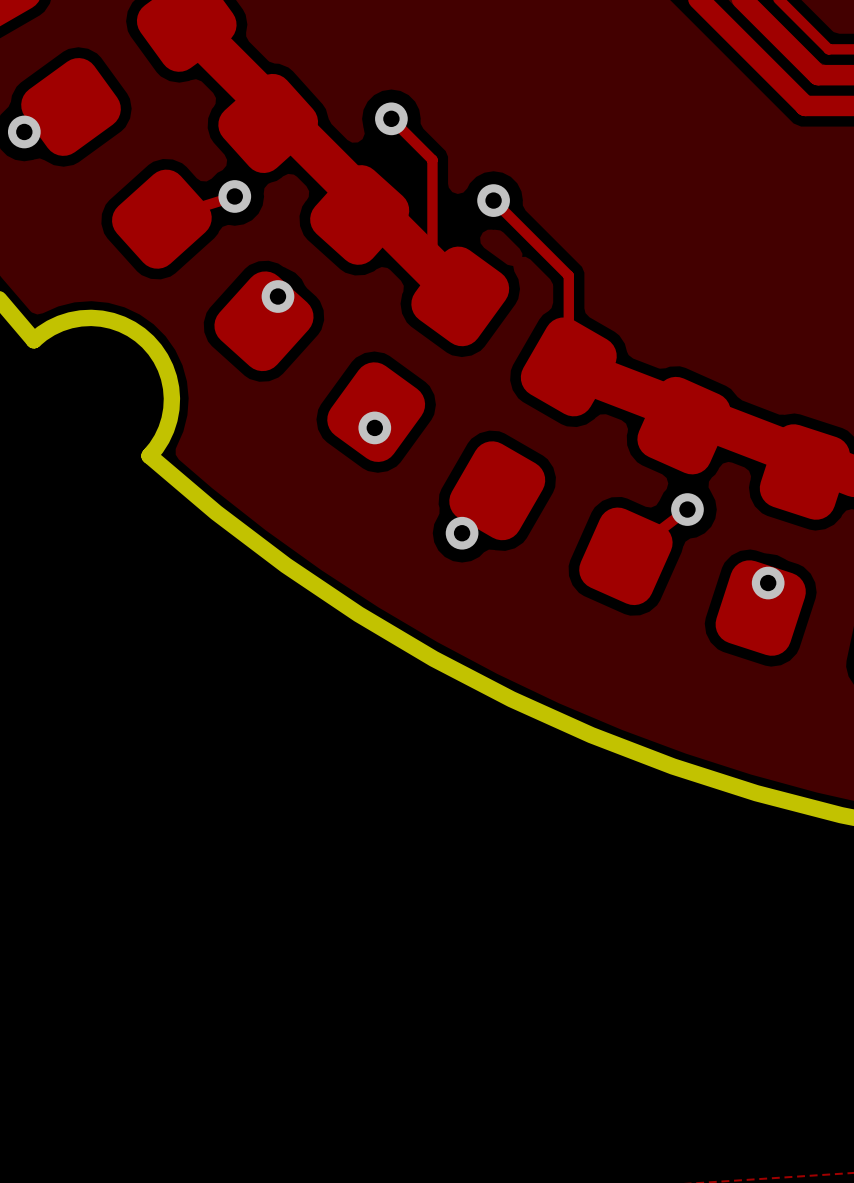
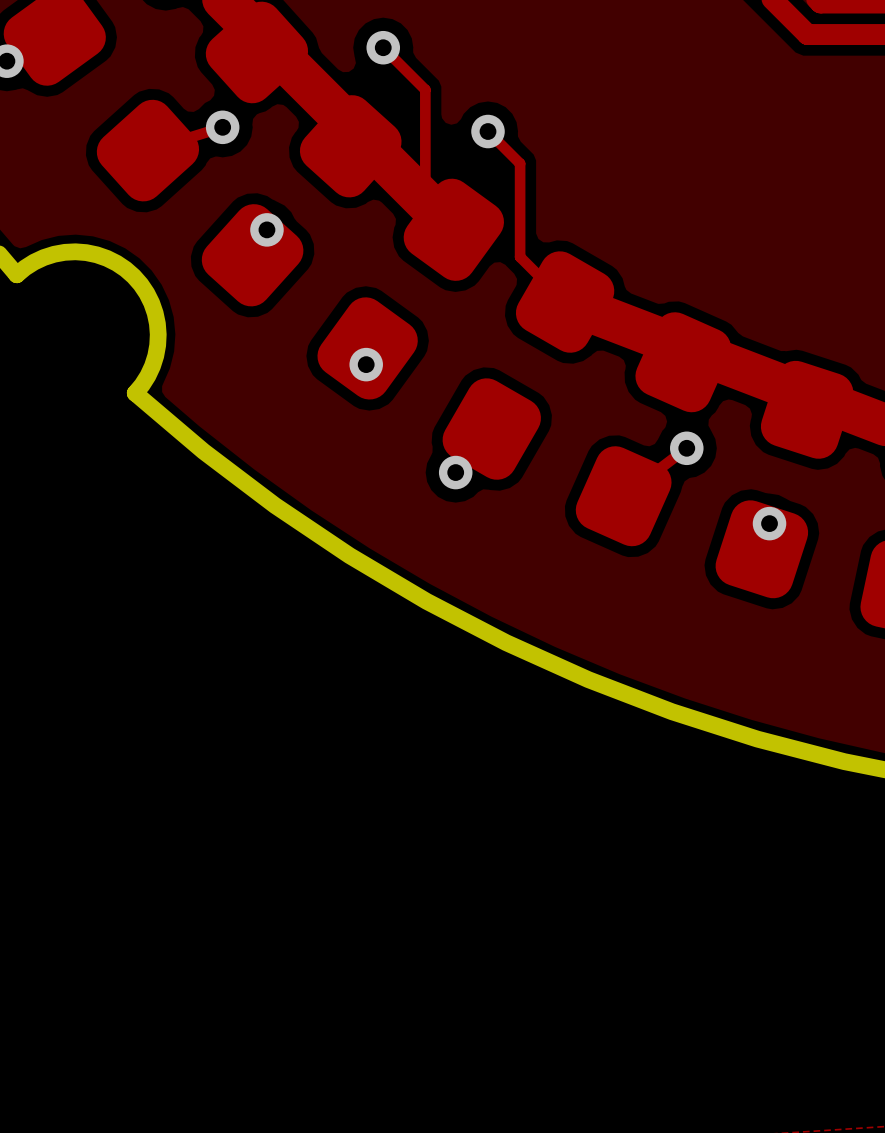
track: (524, 231) (568, 275) (568, 366) -> (520, 163) (520, 257) (565, 302)

